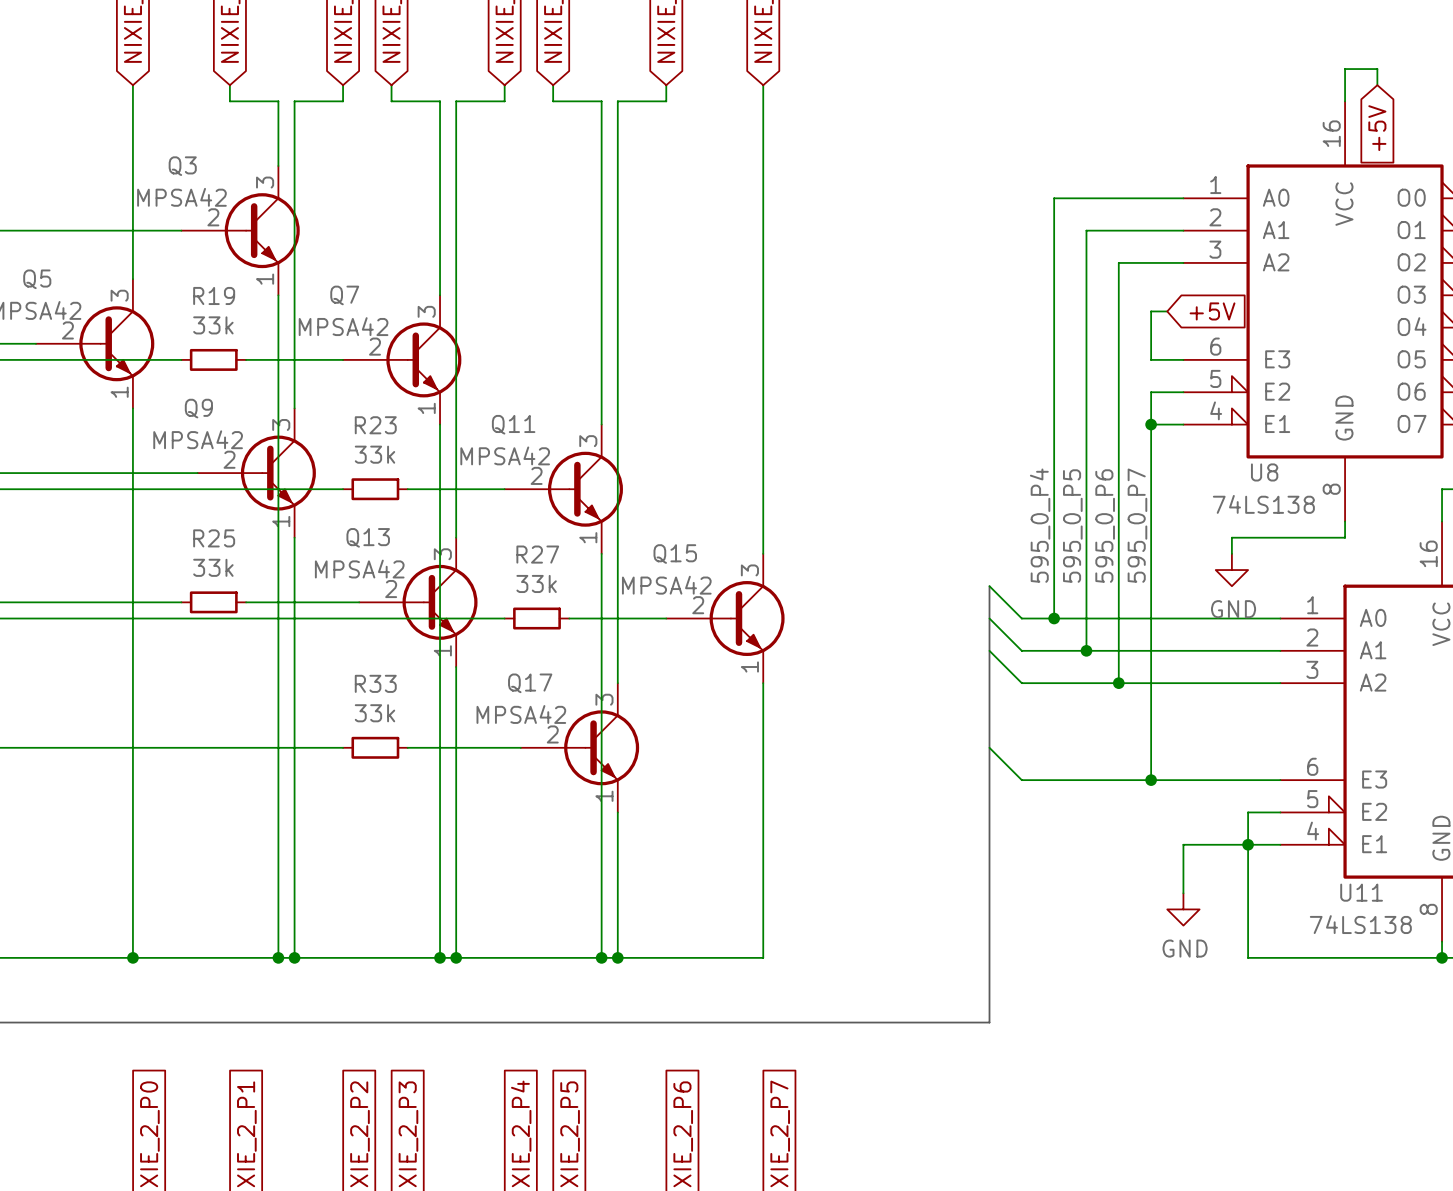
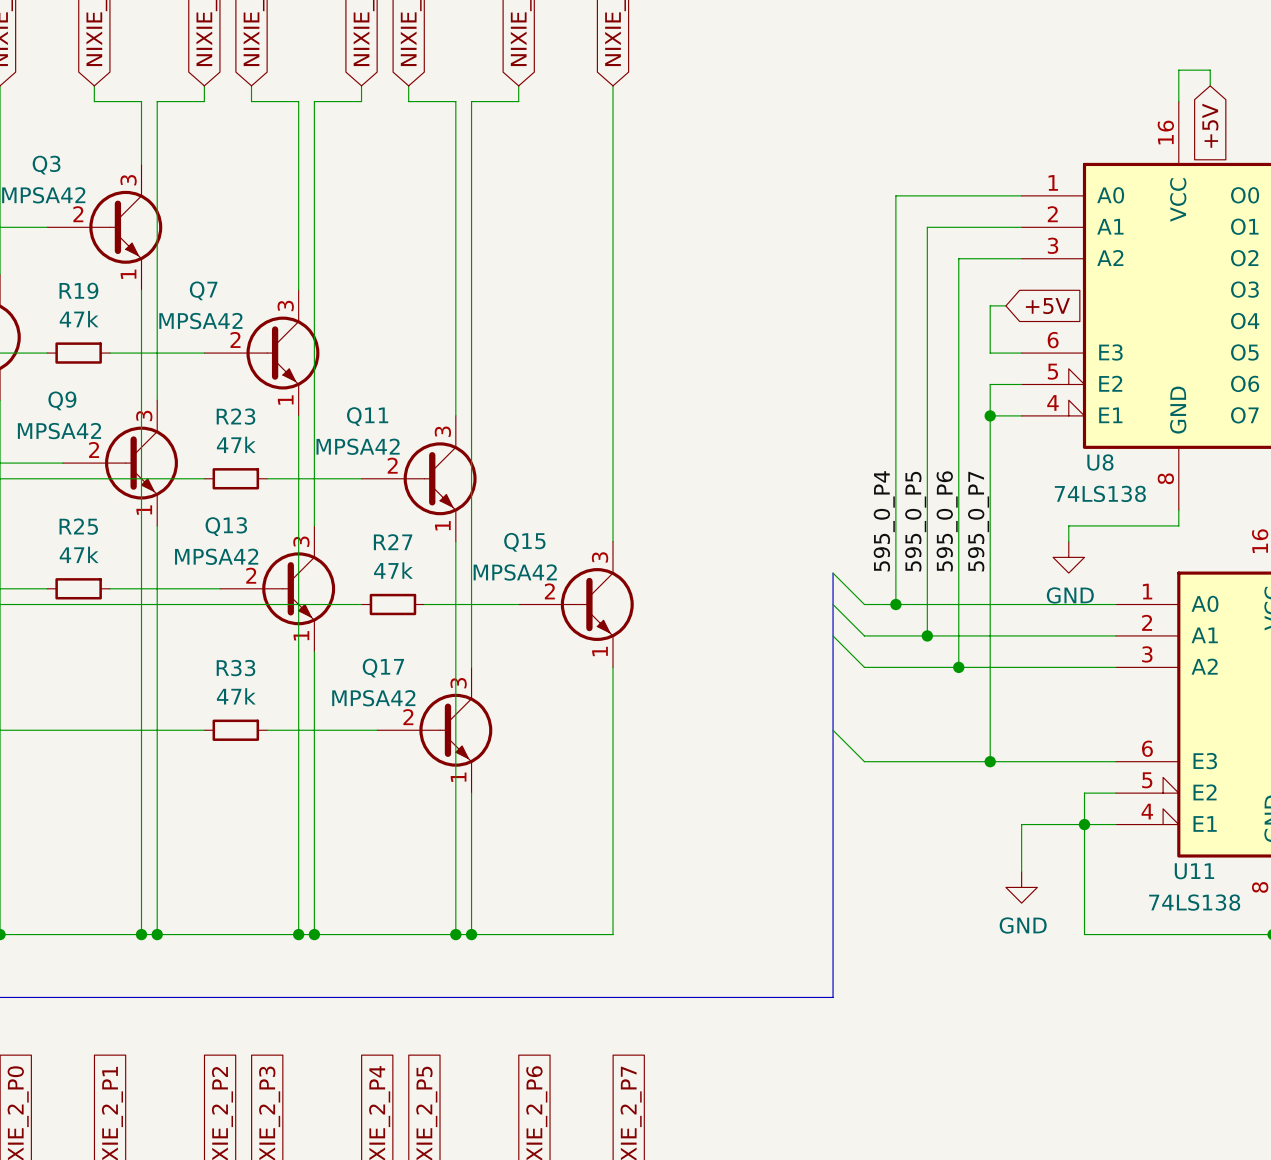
R19 value: 33k (213, 325) -> 47k (79, 319)
R23 value: 33k (374, 454) -> 47k (236, 444)
R25 value: 33k (213, 567) -> 47k (79, 554)
R27 value: 33k (536, 583) -> 47k (393, 570)
R33 value: 33k (374, 713) -> 47k (236, 696)

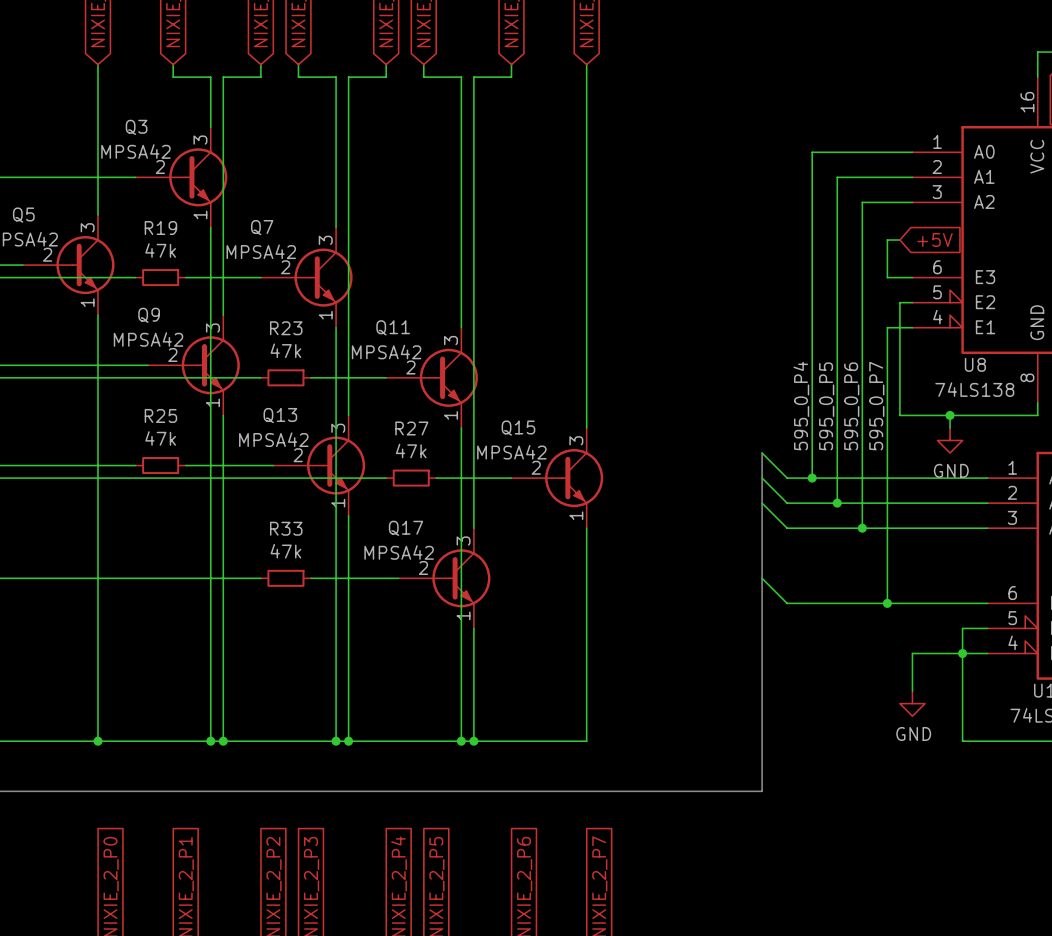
wire: (1005, 384) (990, 384) (990, 415) -> (899, 302) (899, 415) (950, 415)
junction: (990, 415) -> none
junction: none -> (950, 415)

